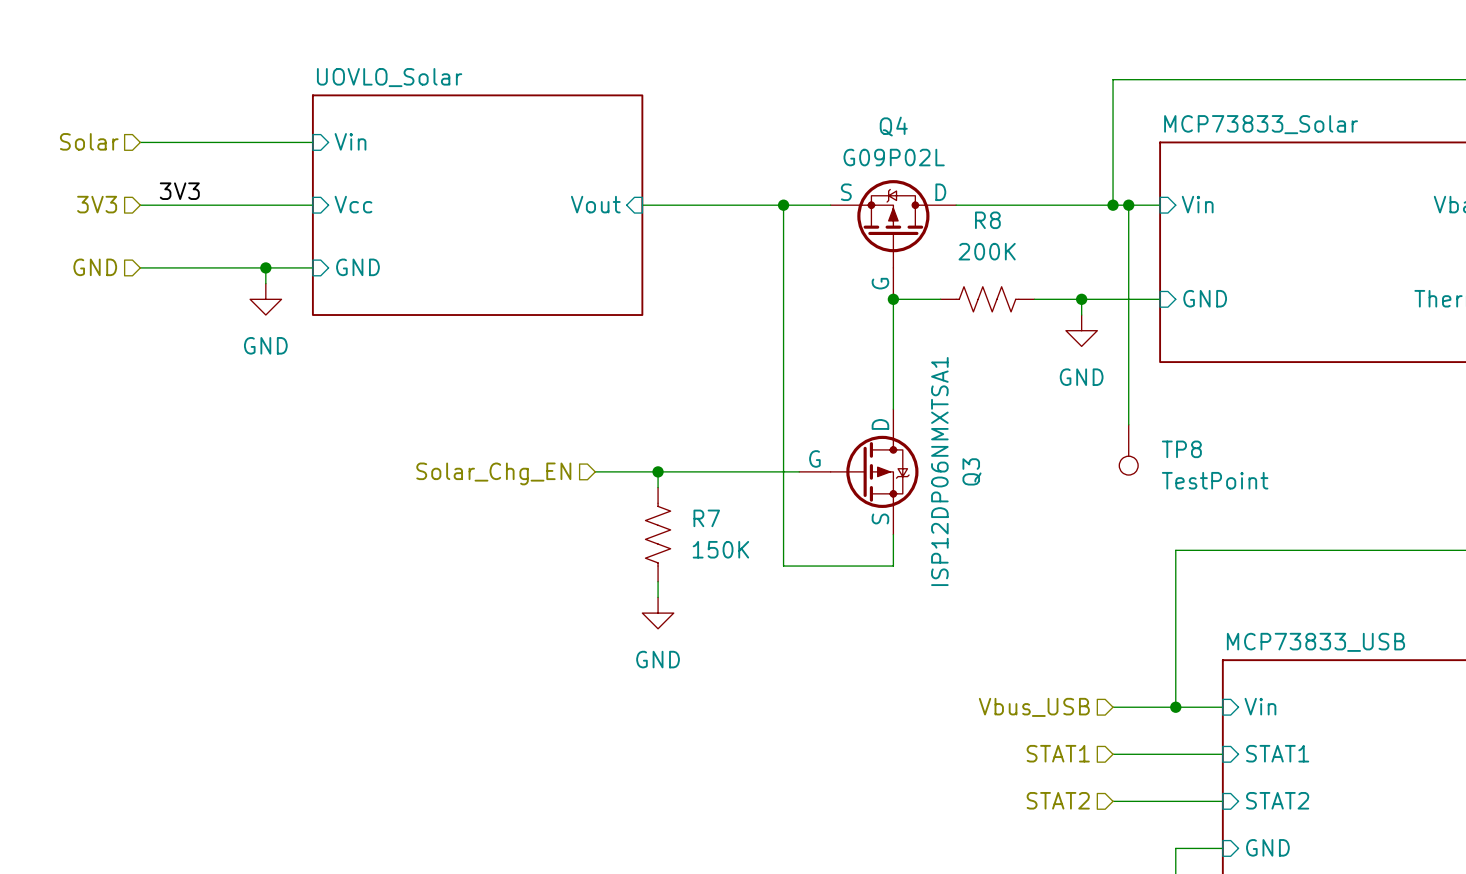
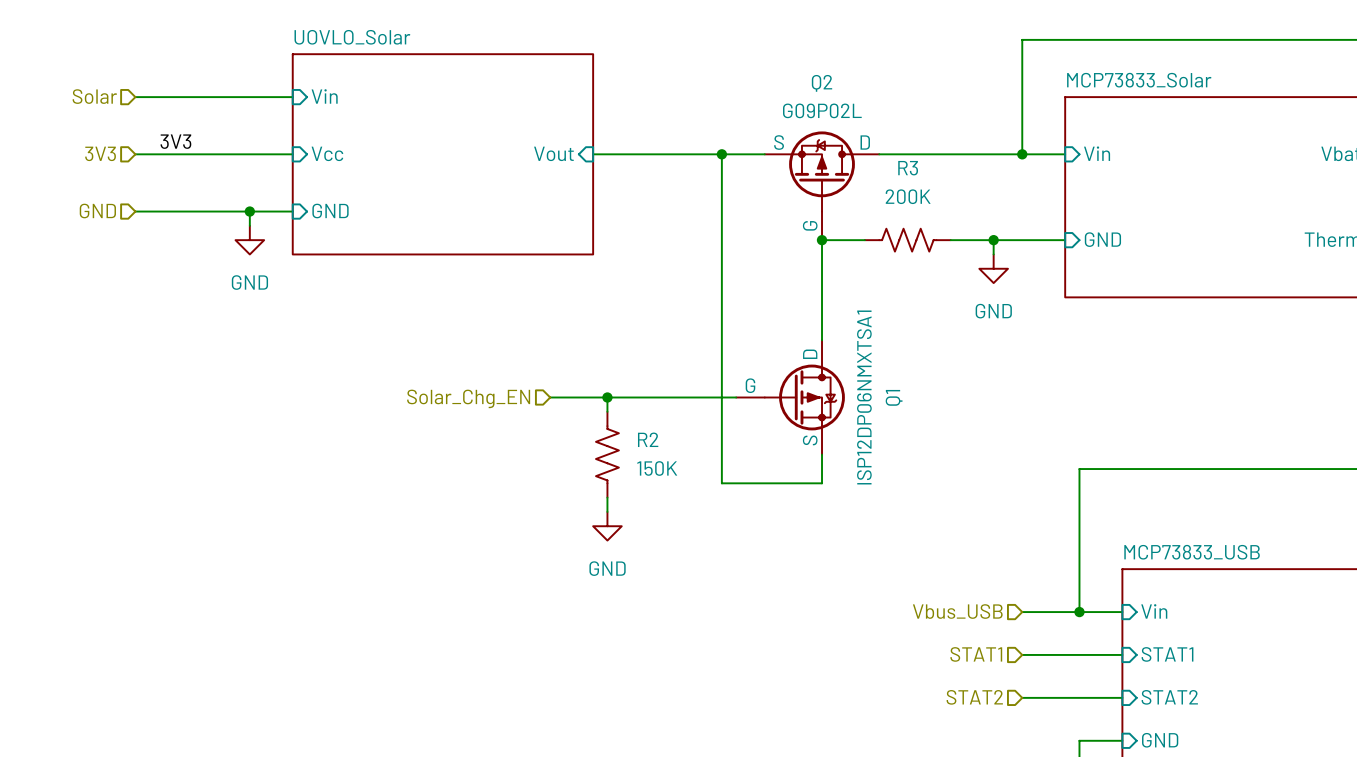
Q4 name: Q4 (893, 126) -> Q2 (822, 83)
wire: (1128, 205) (1128, 424) -> none
junction: (1128, 205) -> none
R8 name: R8 (987, 220) -> R3 (908, 168)
TP8: TestPoint (1128, 449) -> none
Q3 name: Q3 (971, 471) -> Q1 (894, 397)
R7 name: R7 (706, 518) -> R2 (648, 439)

